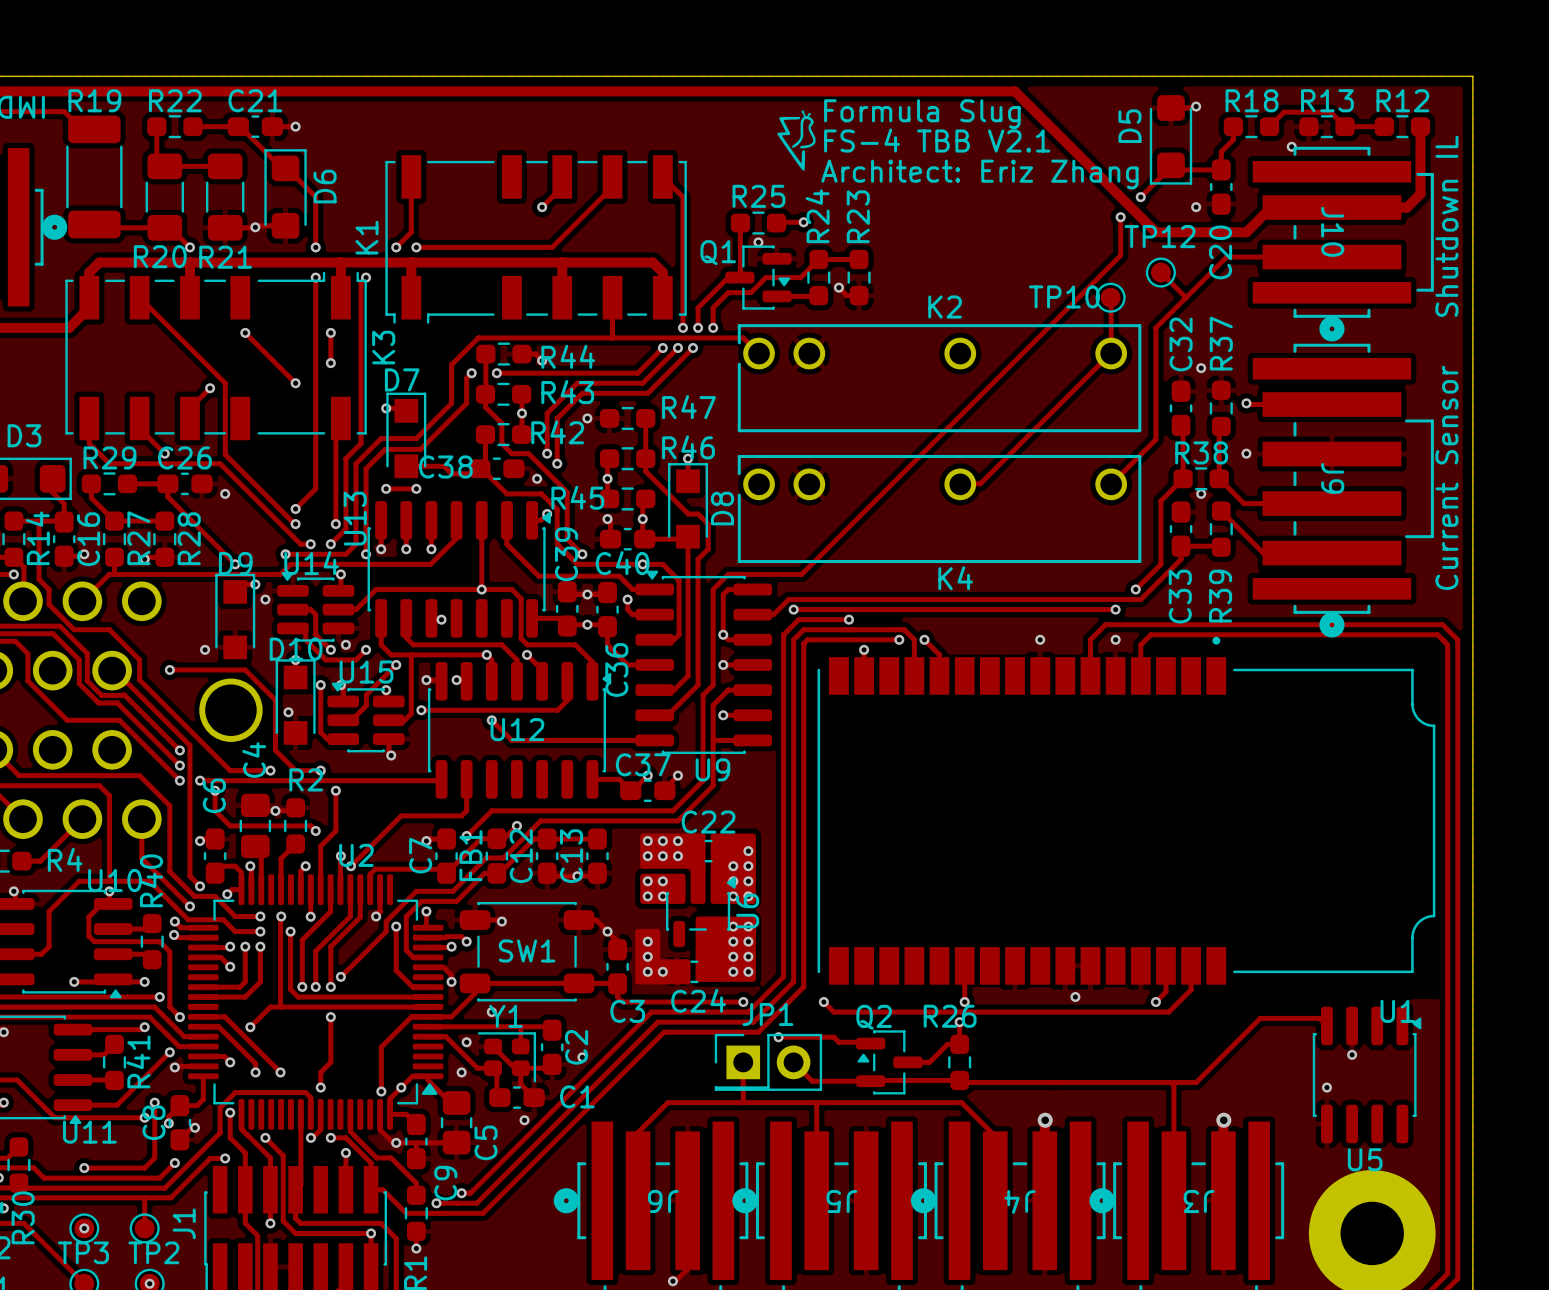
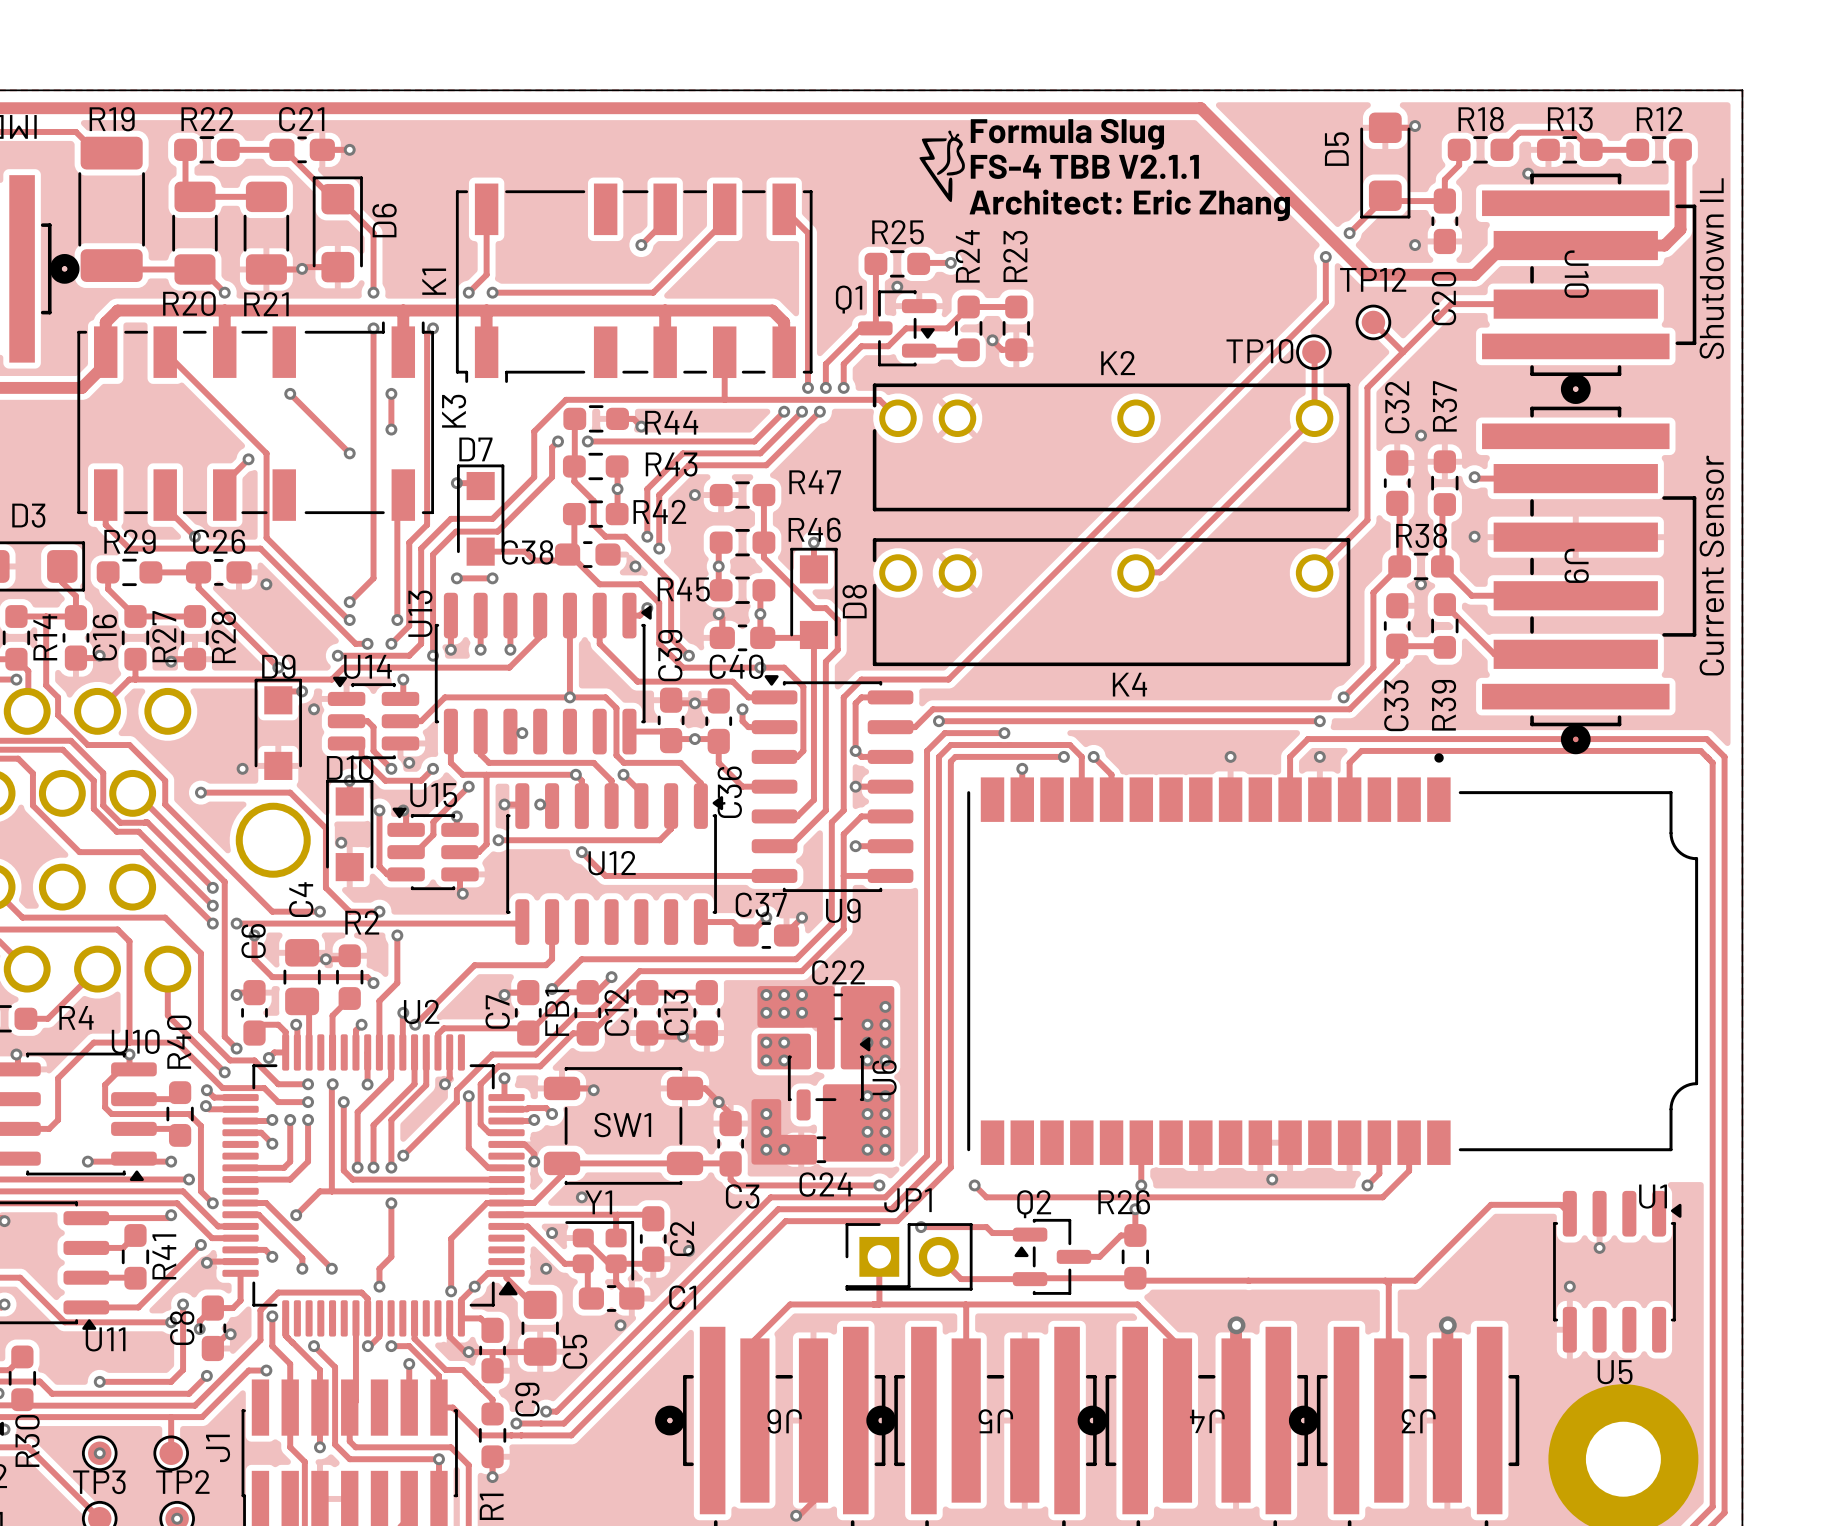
drawing shape: [777, 99, 1139, 190] -> [919, 118, 1290, 222]

